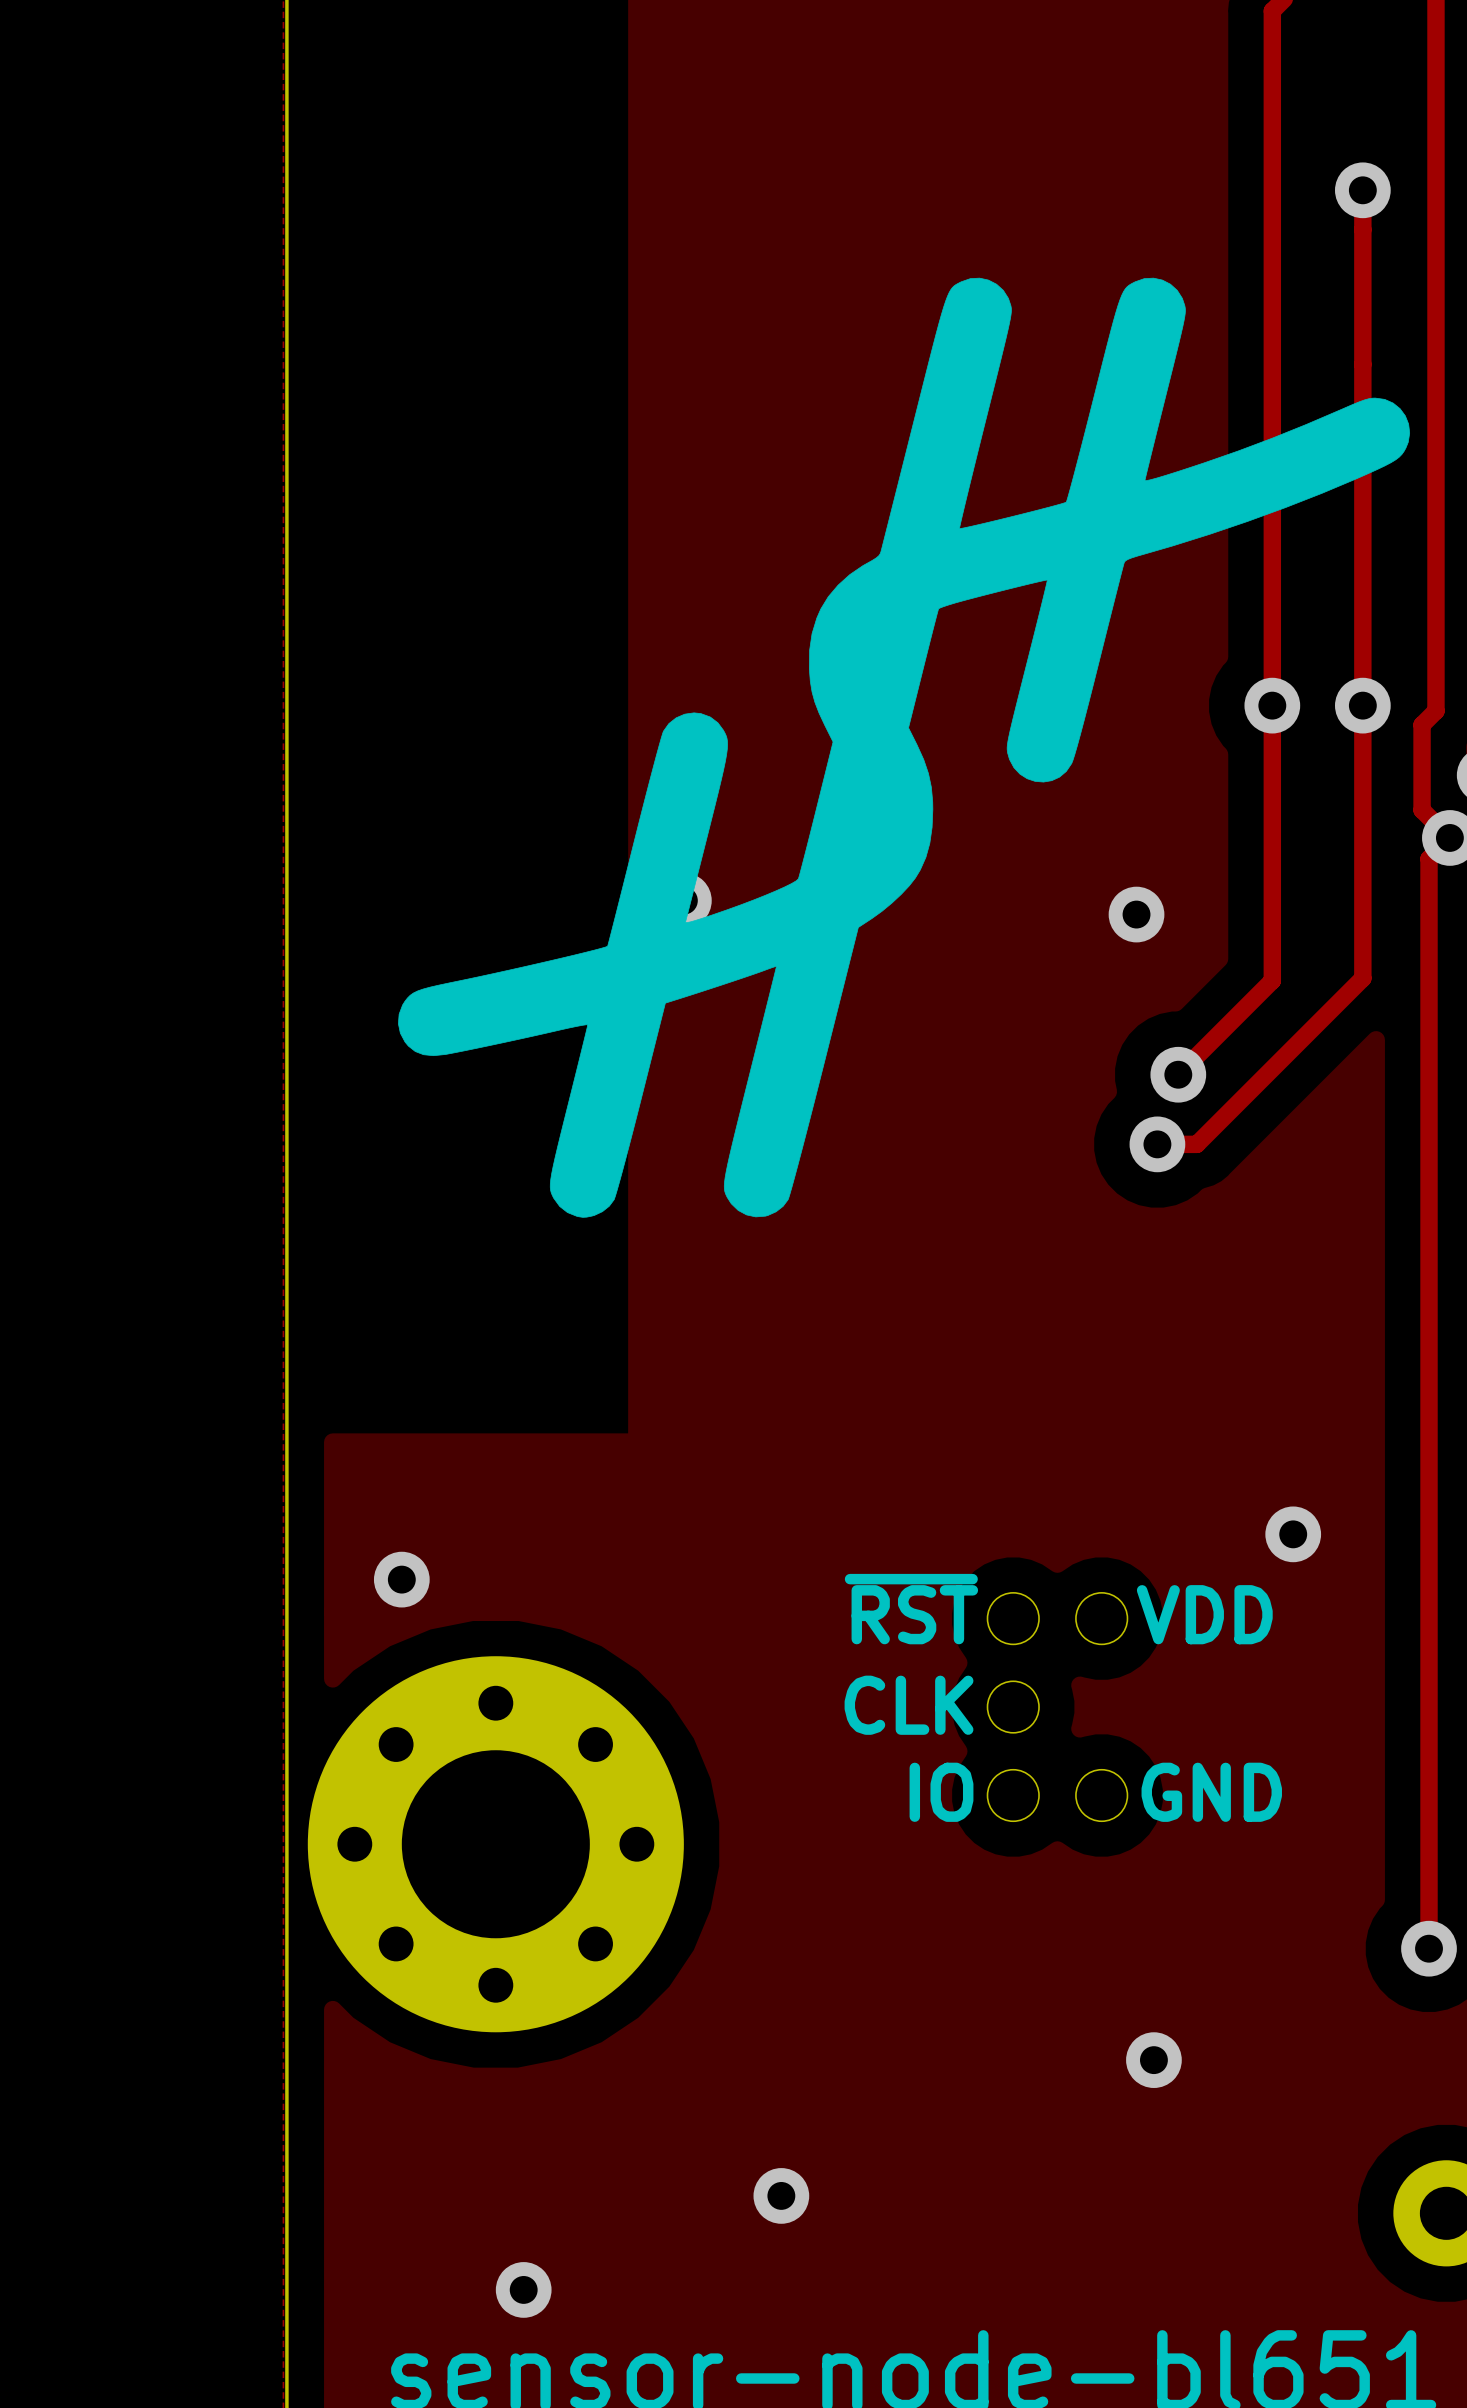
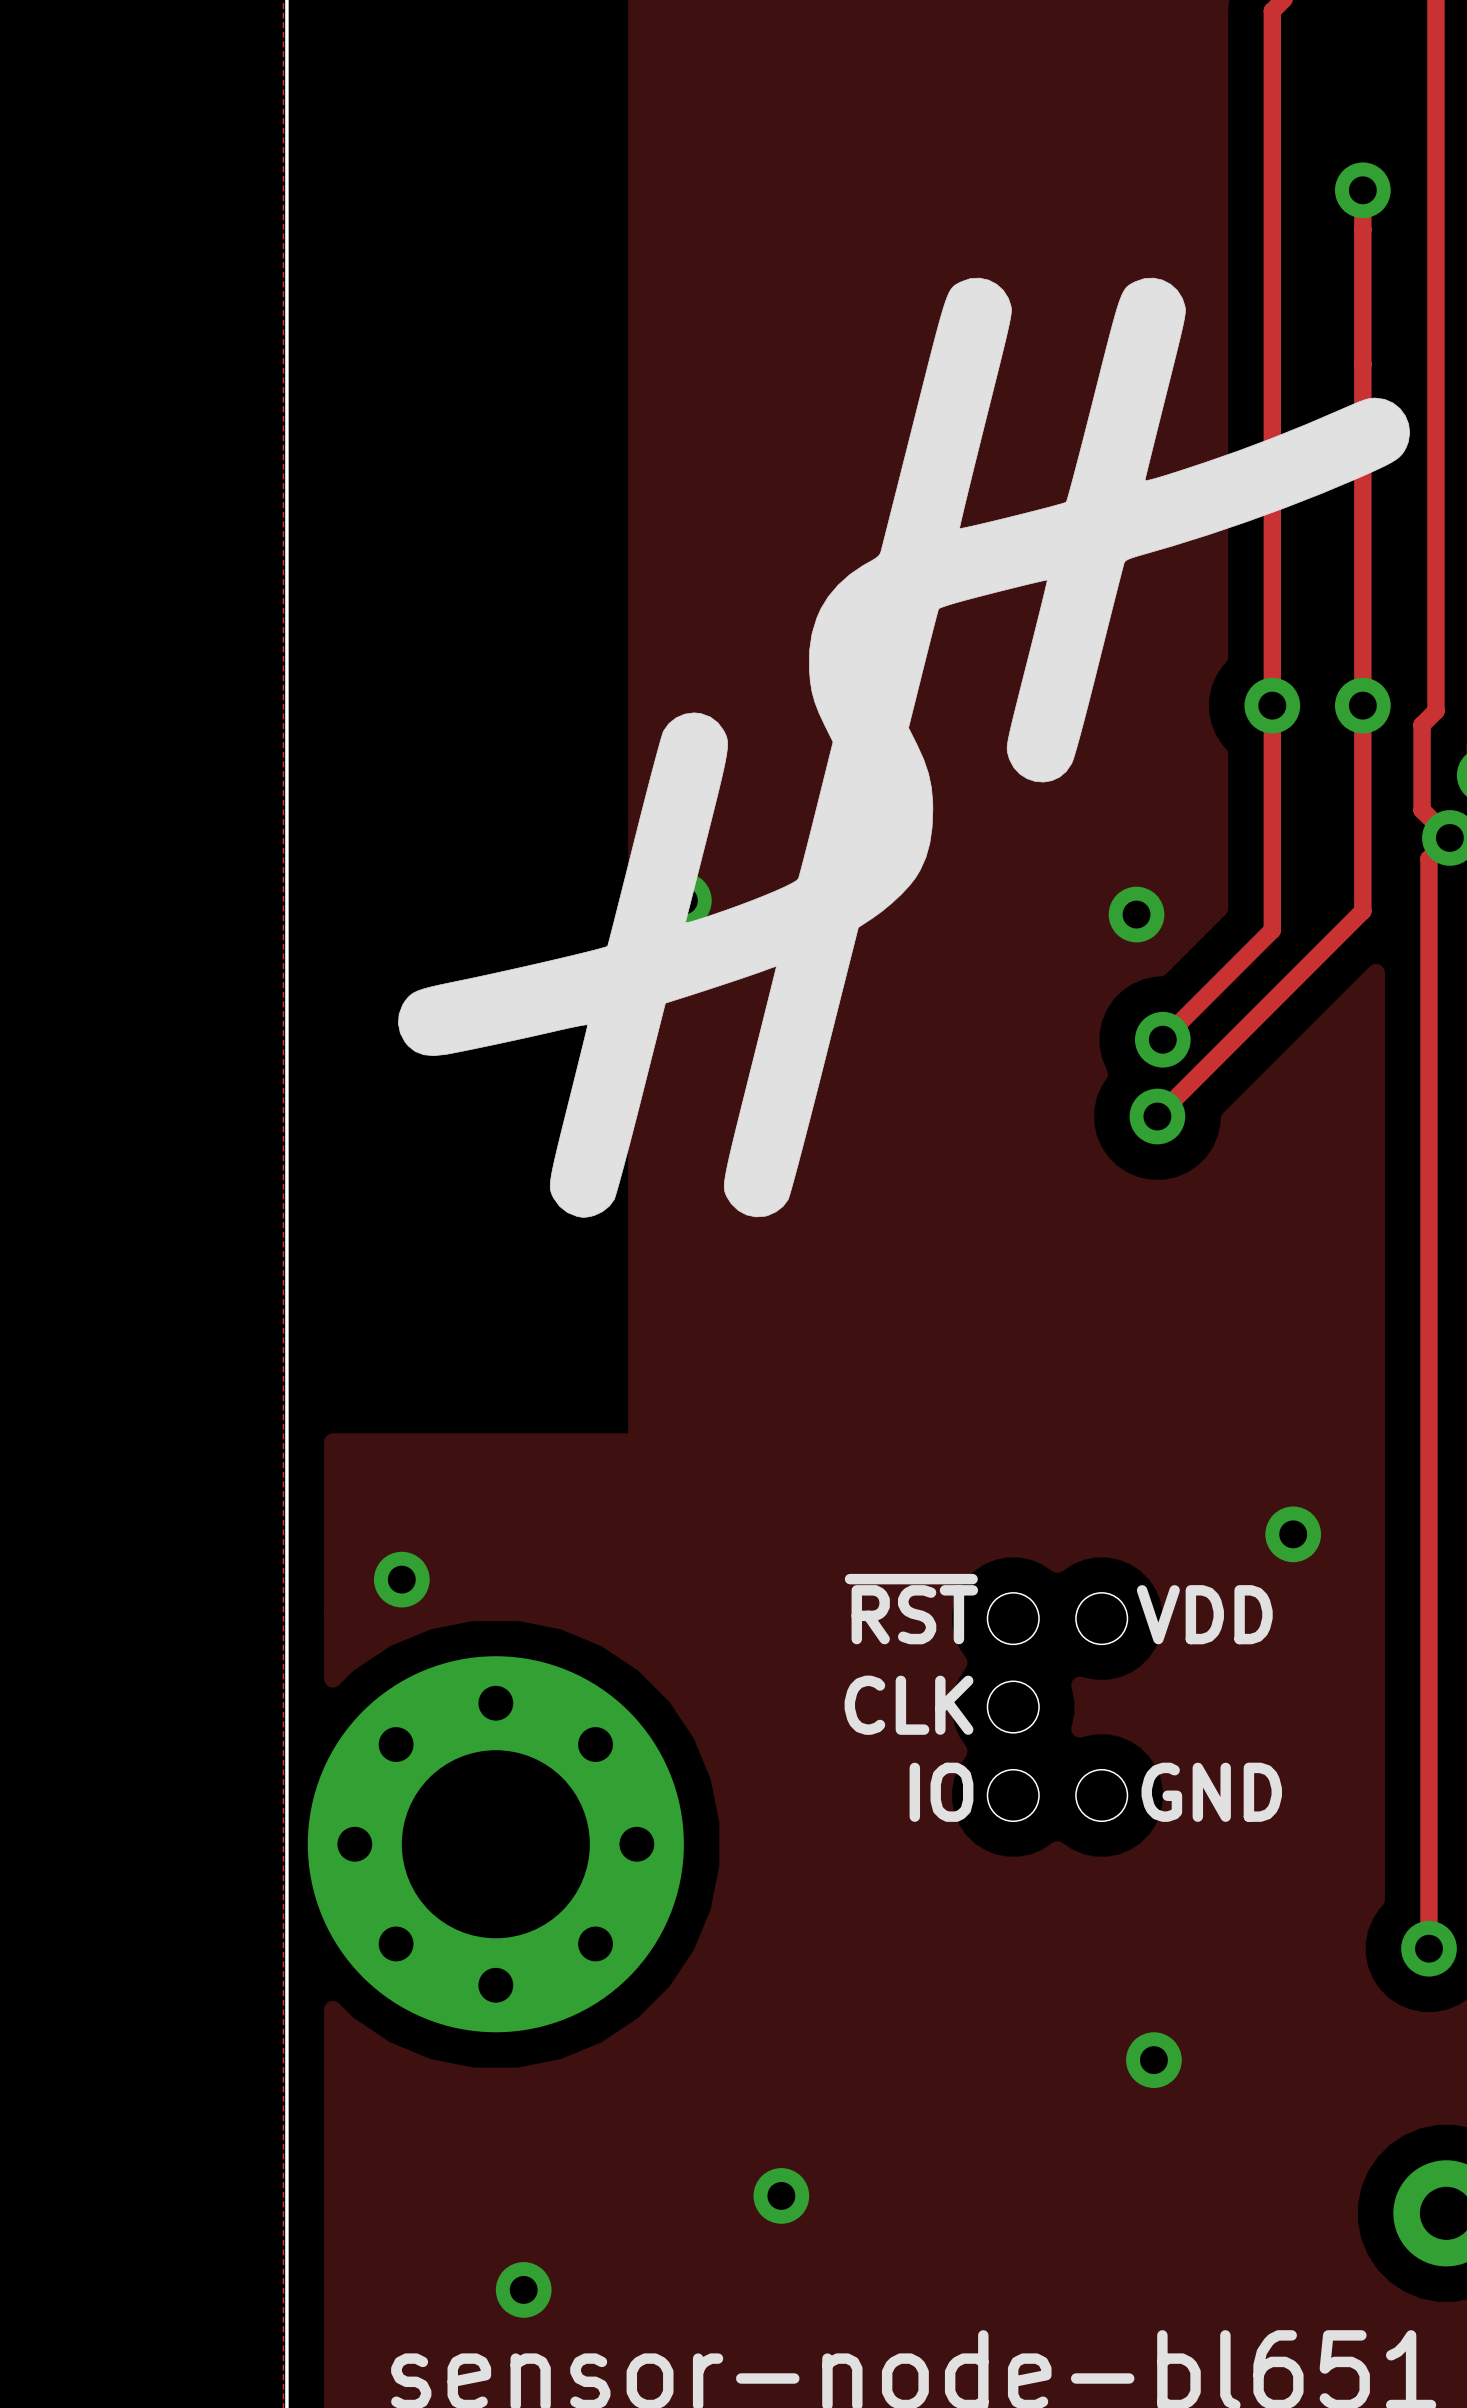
track: (1362, 911) (1362, 978) (1196, 1144) (1157, 1144) -> (1362, 911) (1157, 1116)
track: (1272, 930) (1272, 980) (1178, 1074) -> (1272, 930) (1162, 1039)
via: none -> (1162, 1039)
via: (1178, 1074) -> none
via: none -> (1157, 1116)
via: (1157, 1144) -> none

